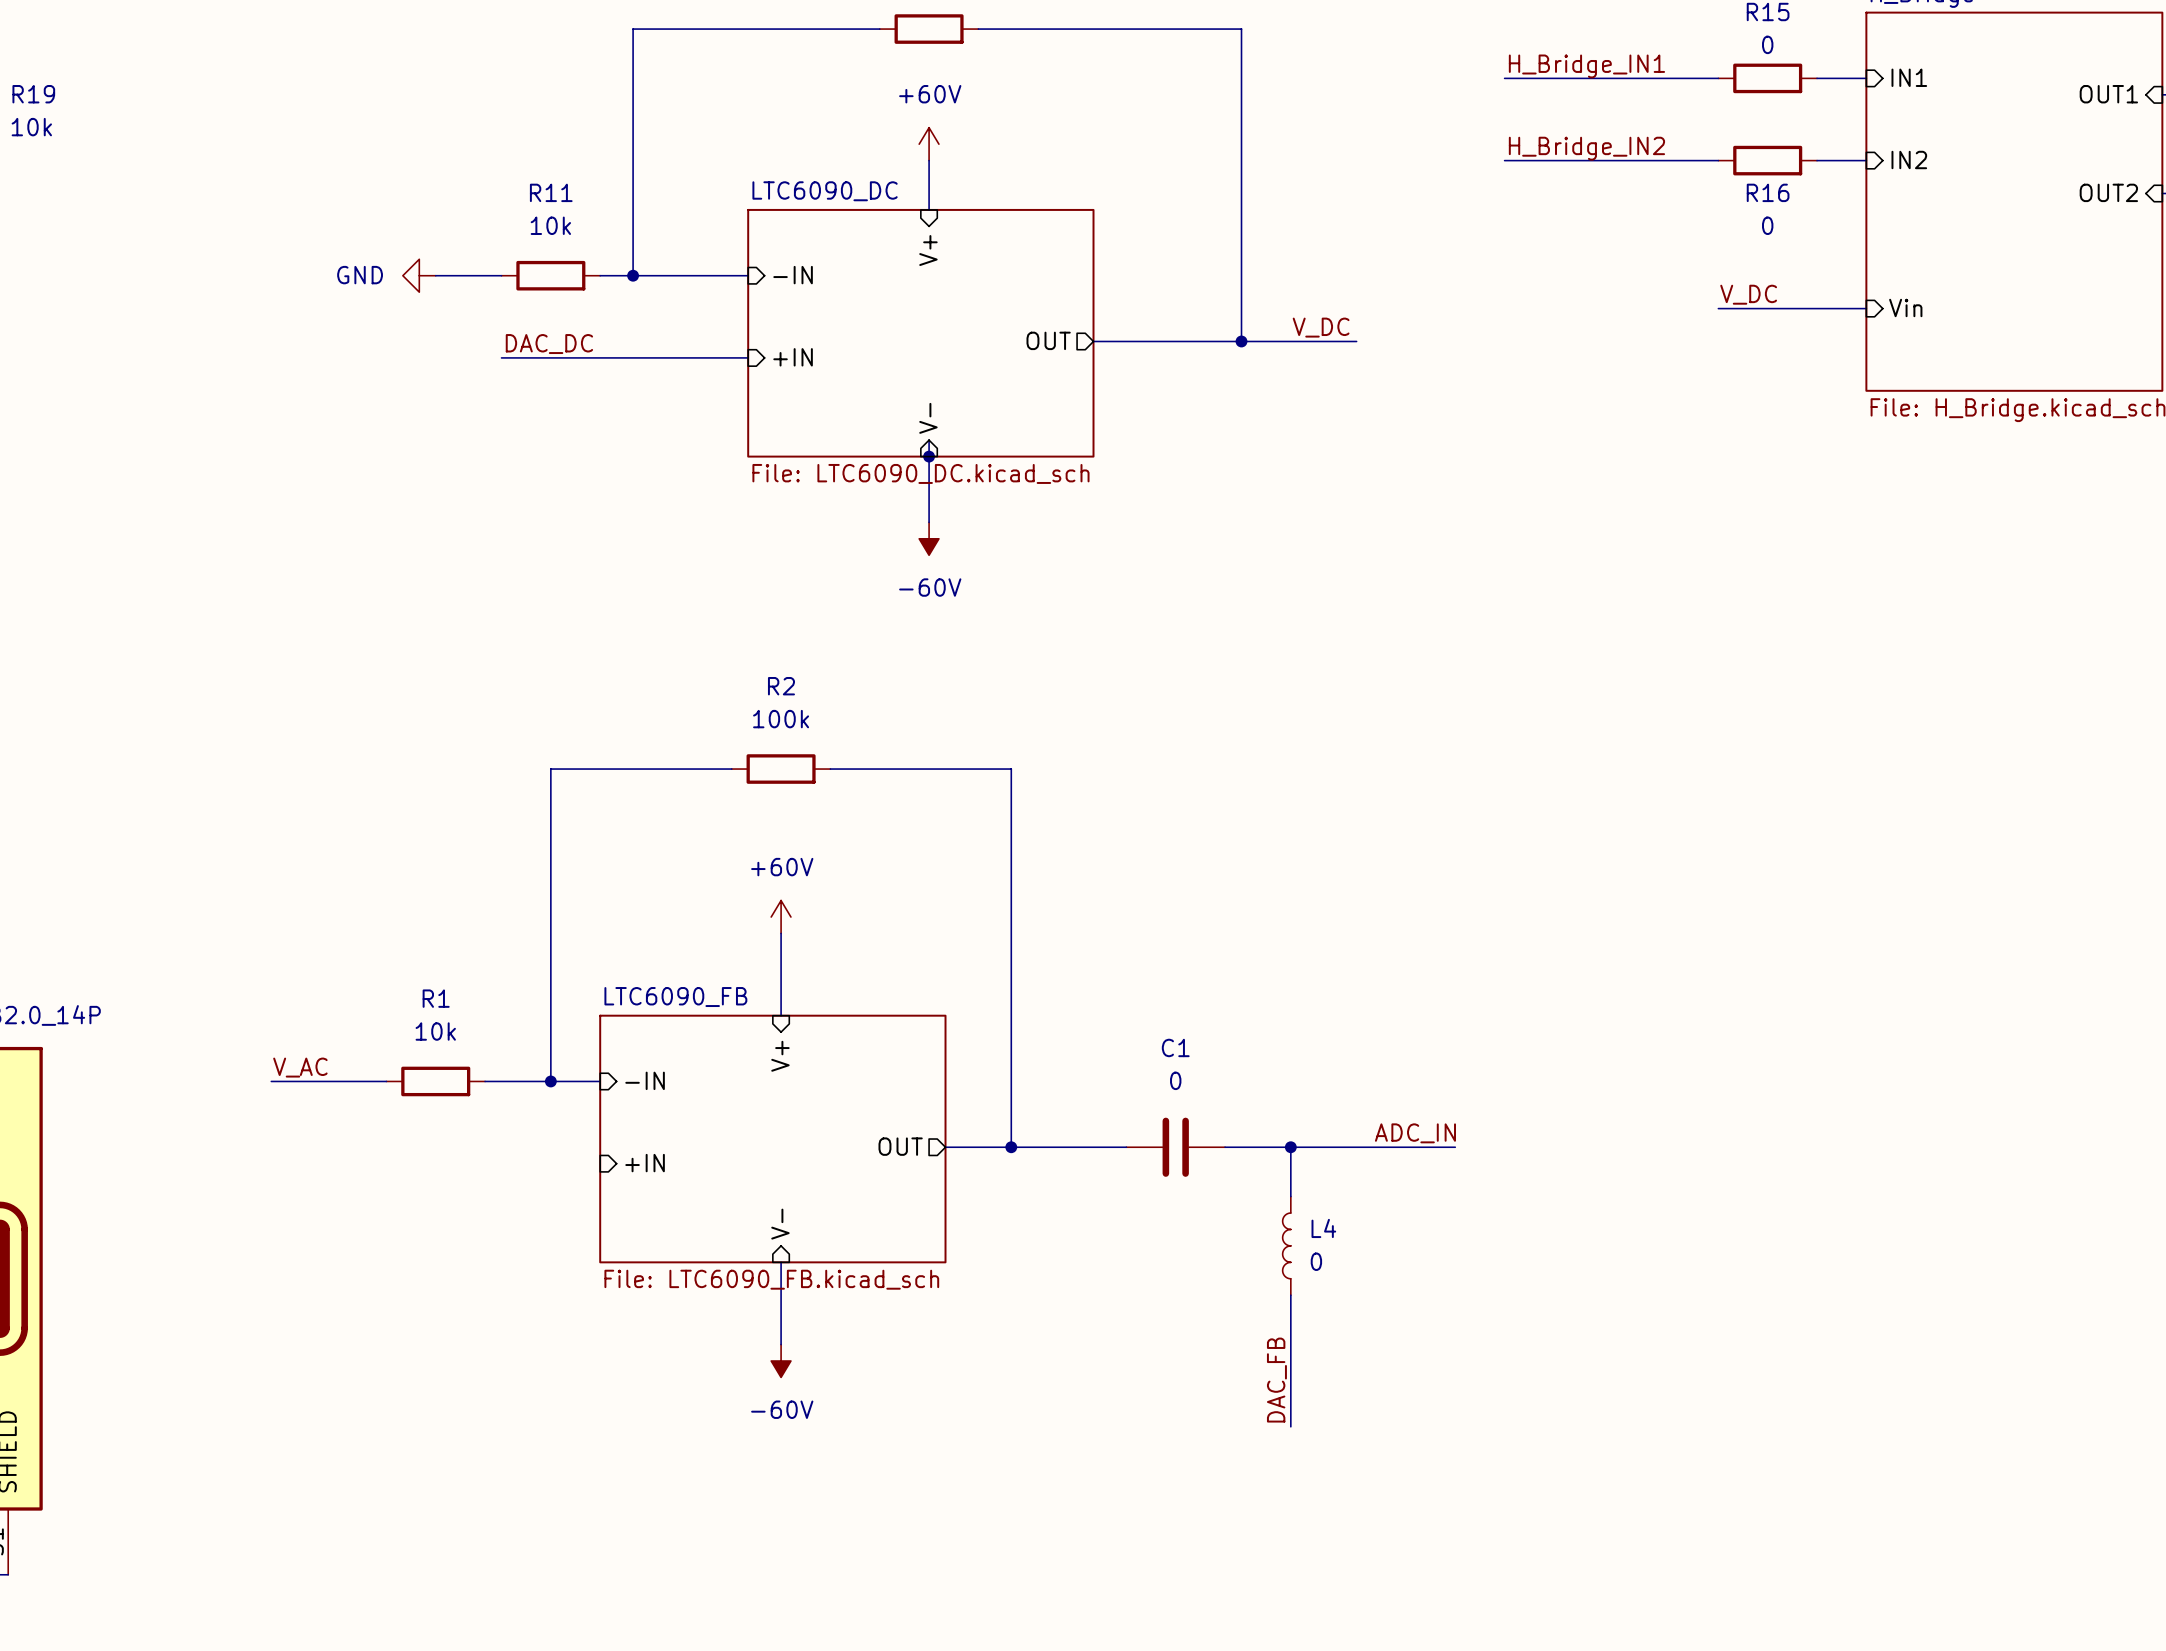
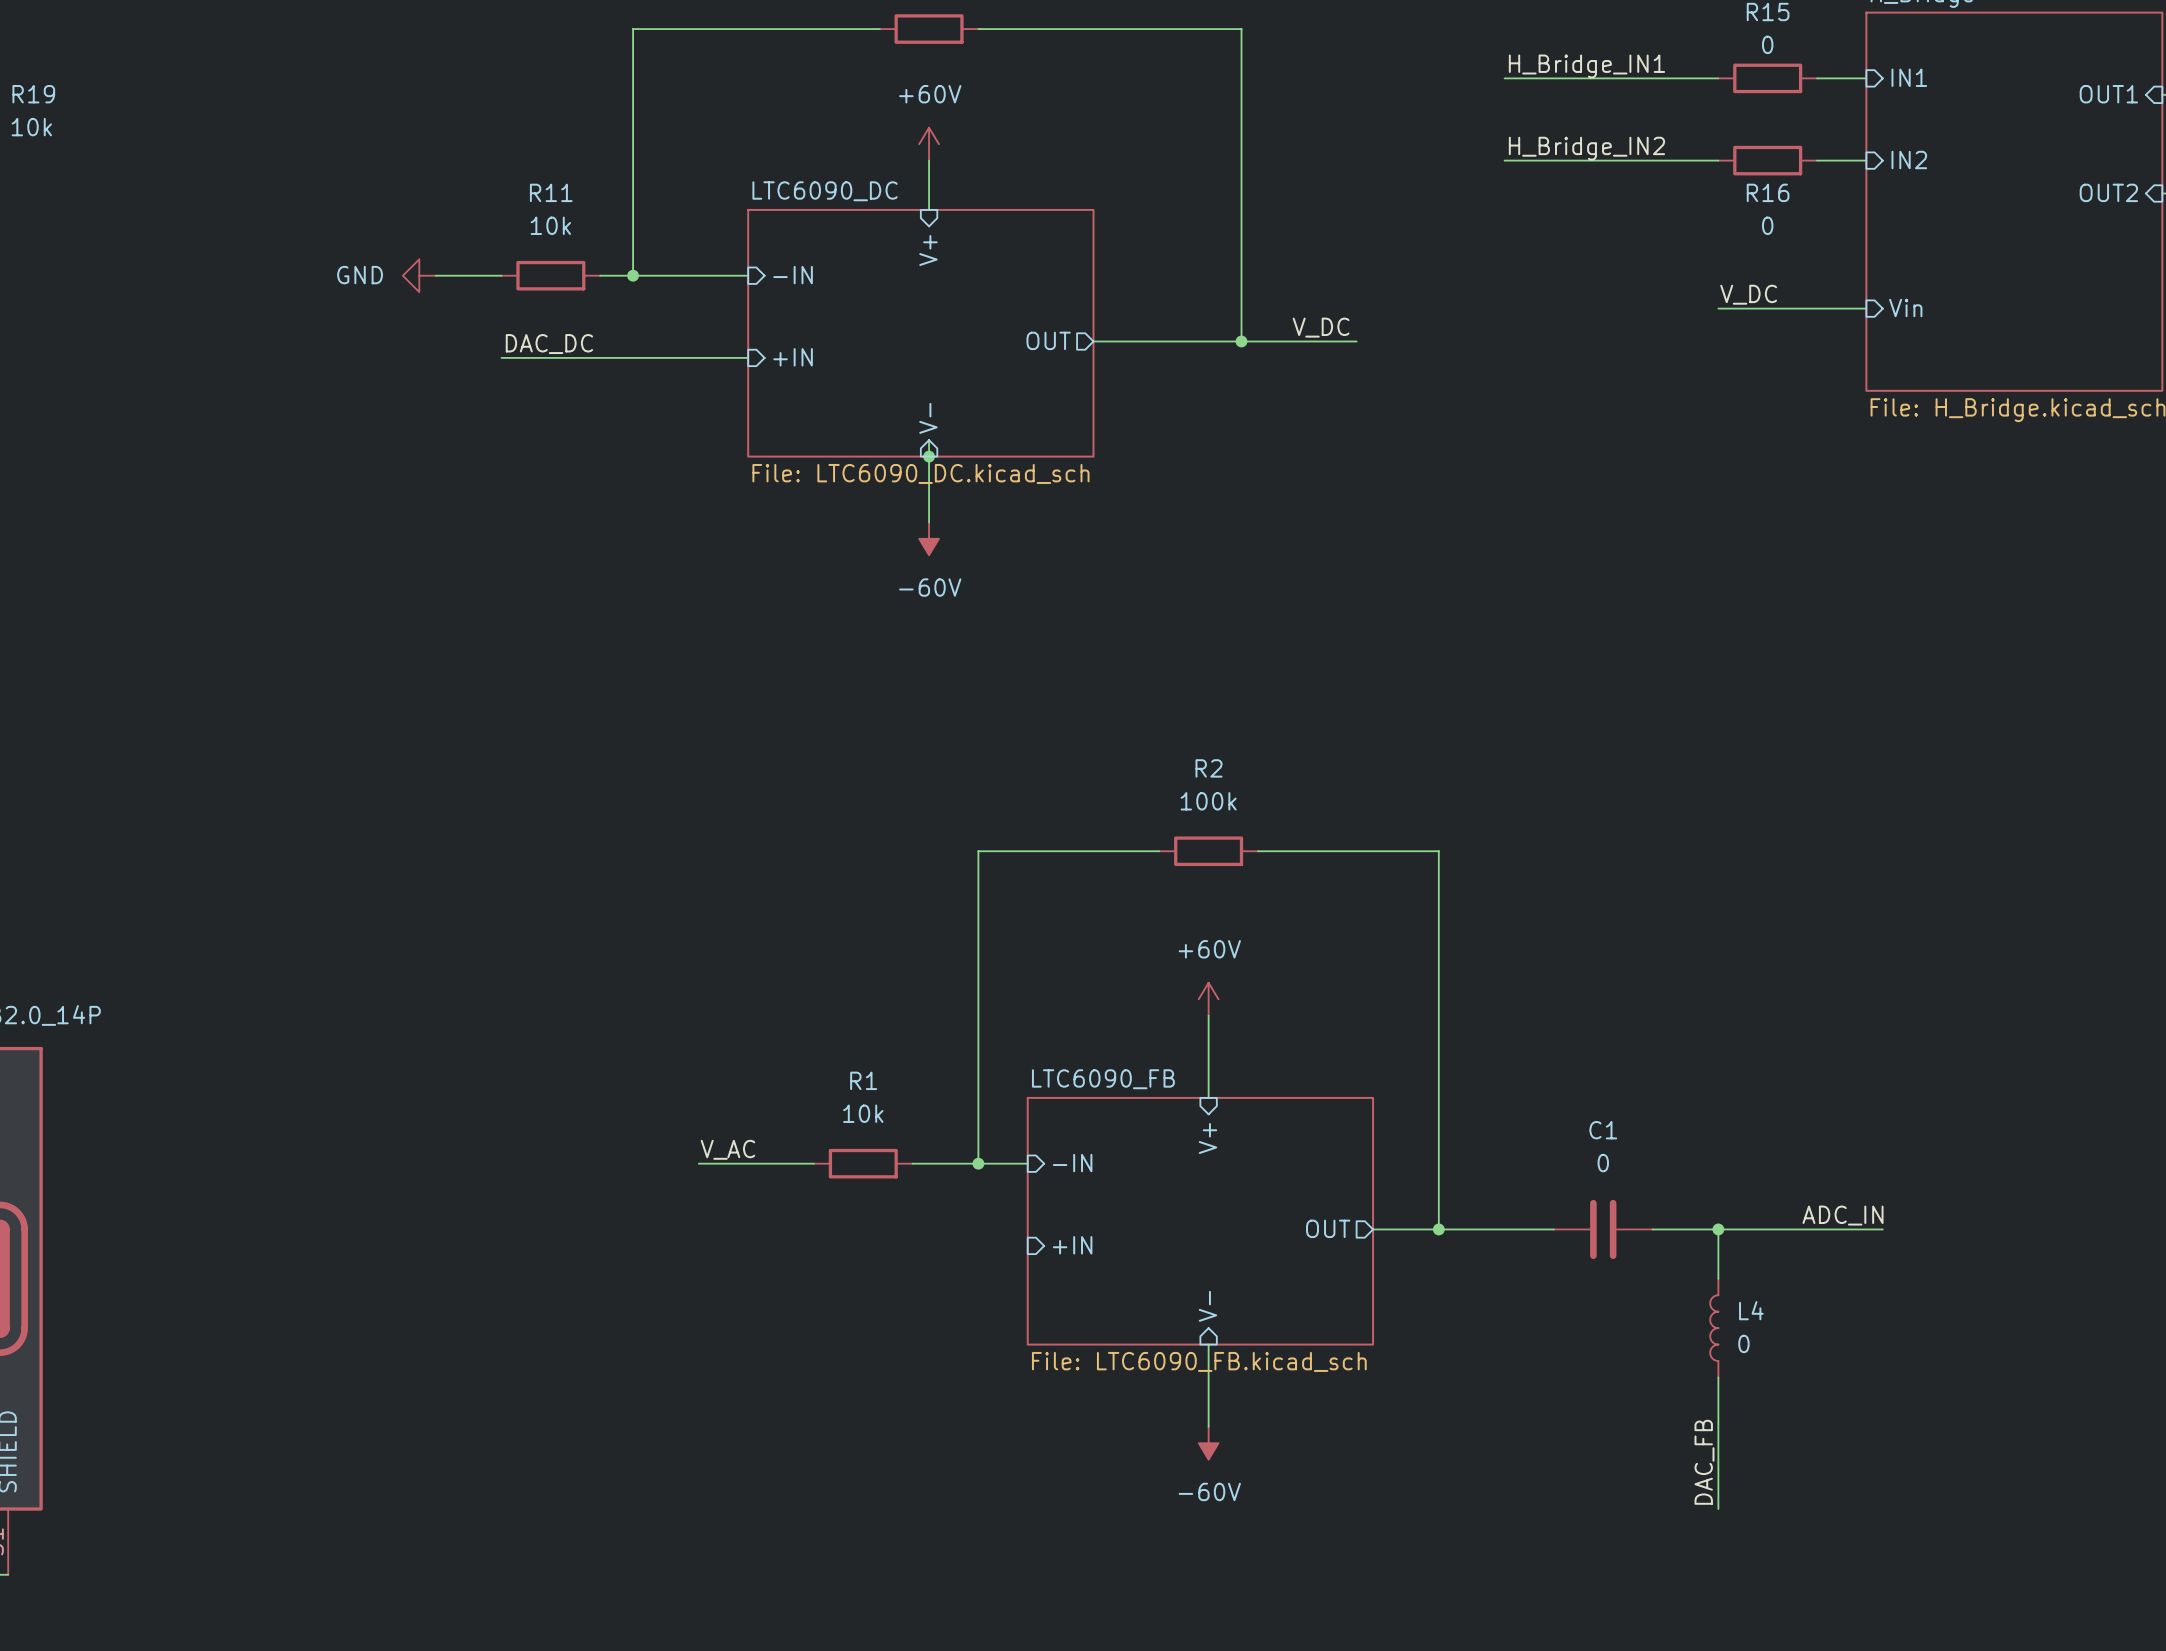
wire: (731, 769) (550, 769) (550, 1081) -> none
R2 position: (781, 769) -> (1208, 851)
wire: (830, 769) (1011, 769) (1011, 1147) -> none
wire: none -> (1159, 851) (978, 851) (978, 1163)
wire: none -> (1257, 851) (1438, 851) (1438, 1229)
power symbol: +60V (781, 917) -> none
wire: (781, 933) (781, 1015) -> none
power symbol: none -> +60V (1208, 999)
wire: none -> (1208, 1015) (1208, 1097)
sheet pin: V+ (780, 1056) -> none
label: V_AC (300, 1067) -> none
sheet pin: -IN (645, 1080) -> none
wire: (271, 1081) (386, 1081) -> none
R1 position: (435, 1081) -> (863, 1163)
wire: (485, 1081) (600, 1081) -> (698, 1163) (813, 1163)
junction: (550, 1081) -> none
label: ADC_IN (1415, 1133) -> none
sheet pin: none -> V+ (1208, 1138)
sheet LTC6090_FB position: (772, 1139) -> (1200, 1221)
sheet pin: OUT (900, 1146) -> none
wire: (945, 1147) (1126, 1147) -> none
junction position: (1011, 1147) -> (978, 1163)
C1 position: (1175, 1147) -> (1603, 1229)
wire: (1225, 1147) (1455, 1147) -> none
wire: (1290, 1147) (1290, 1196) -> none
junction: (1290, 1147) -> none
label: none -> V_AC (727, 1149)
sheet pin: +IN (645, 1163) -> none
wire: none -> (912, 1163) (1027, 1163)
sheet pin: none -> -IN (1072, 1163)
label: none -> ADC_IN (1843, 1215)
sheet pin: V- (780, 1224) -> none
sheet pin: none -> OUT (1328, 1228)
wire: none -> (1373, 1229) (1553, 1229)
junction: none -> (1438, 1229)
wire: none -> (1652, 1229) (1882, 1229)
wire: none -> (1718, 1229) (1718, 1278)
junction: none -> (1718, 1229)
sheet pin: none -> +IN (1072, 1245)
L4 position: (1286, 1245) -> (1714, 1328)
wire: (781, 1262) (781, 1344) -> none
wire: (1290, 1295) (1290, 1426) -> none
sheet pin: none -> V- (1208, 1306)
wire: none -> (1208, 1344) (1208, 1426)
power symbol: -60V (781, 1361) -> none
wire: none -> (1718, 1377) (1718, 1509)
label: DAC_FB (1276, 1380) -> none
power symbol: none -> -60V (1208, 1443)
label: none -> DAC_FB (1704, 1462)

